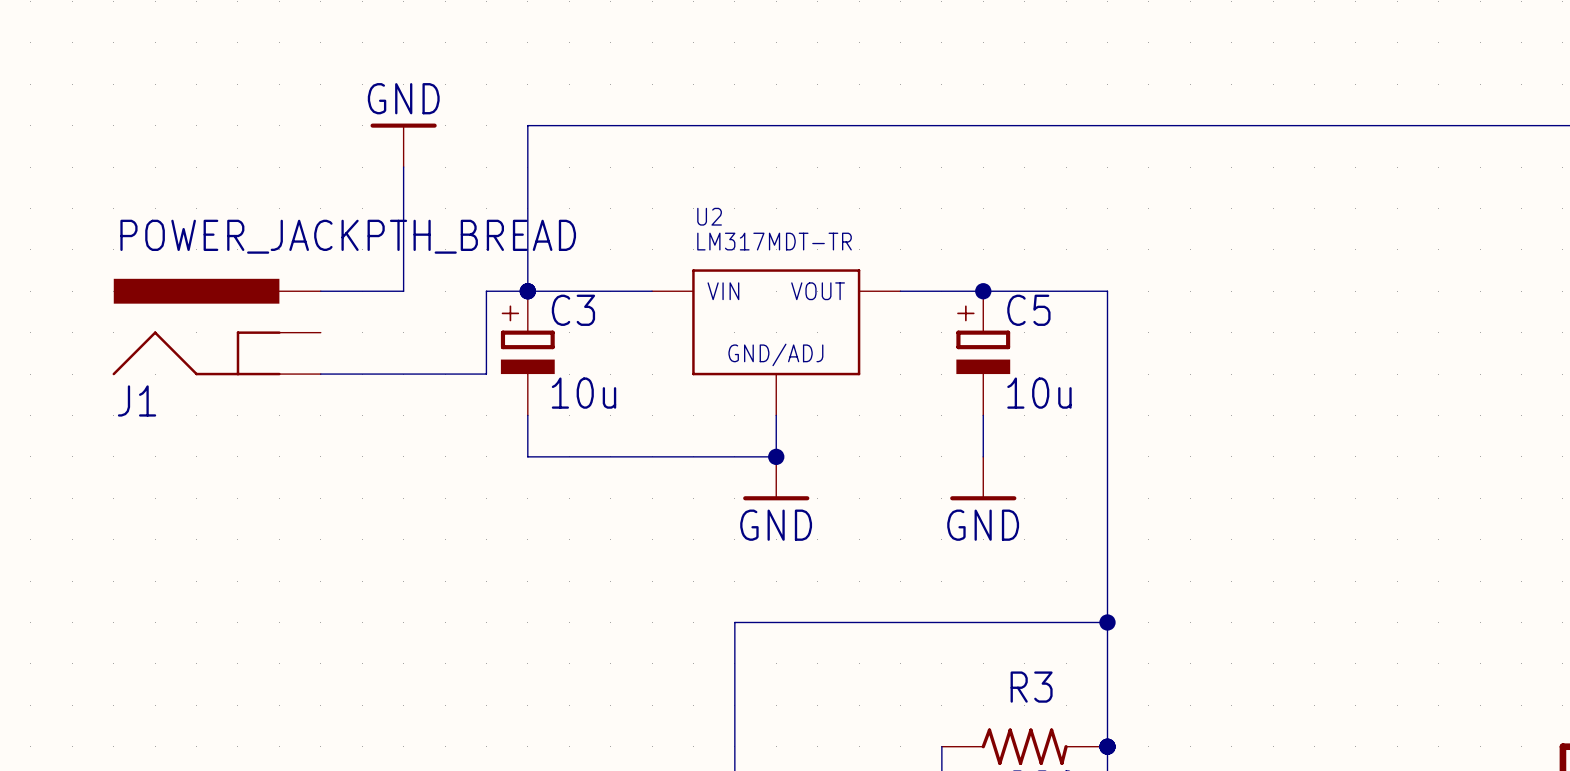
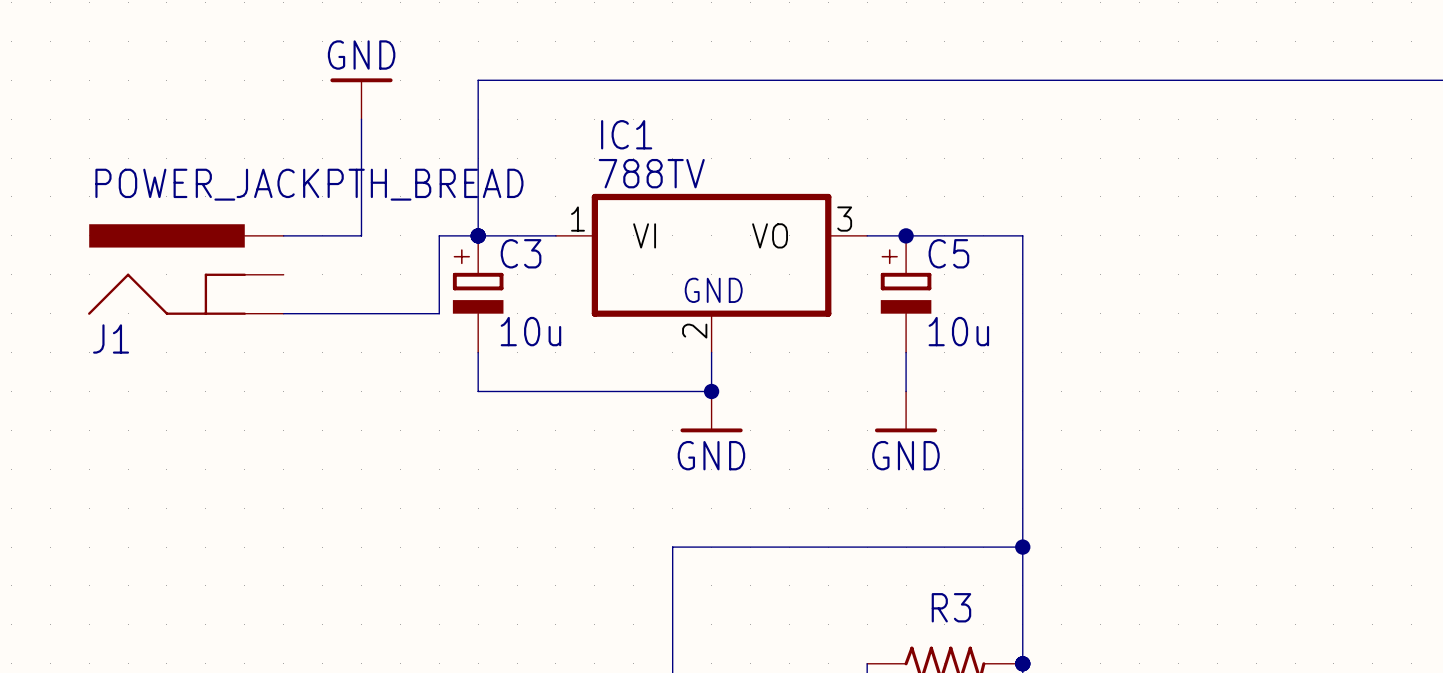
IC1: none -> 788TV (711, 273)
U2: LM317MDT-TR (776, 342) -> none

